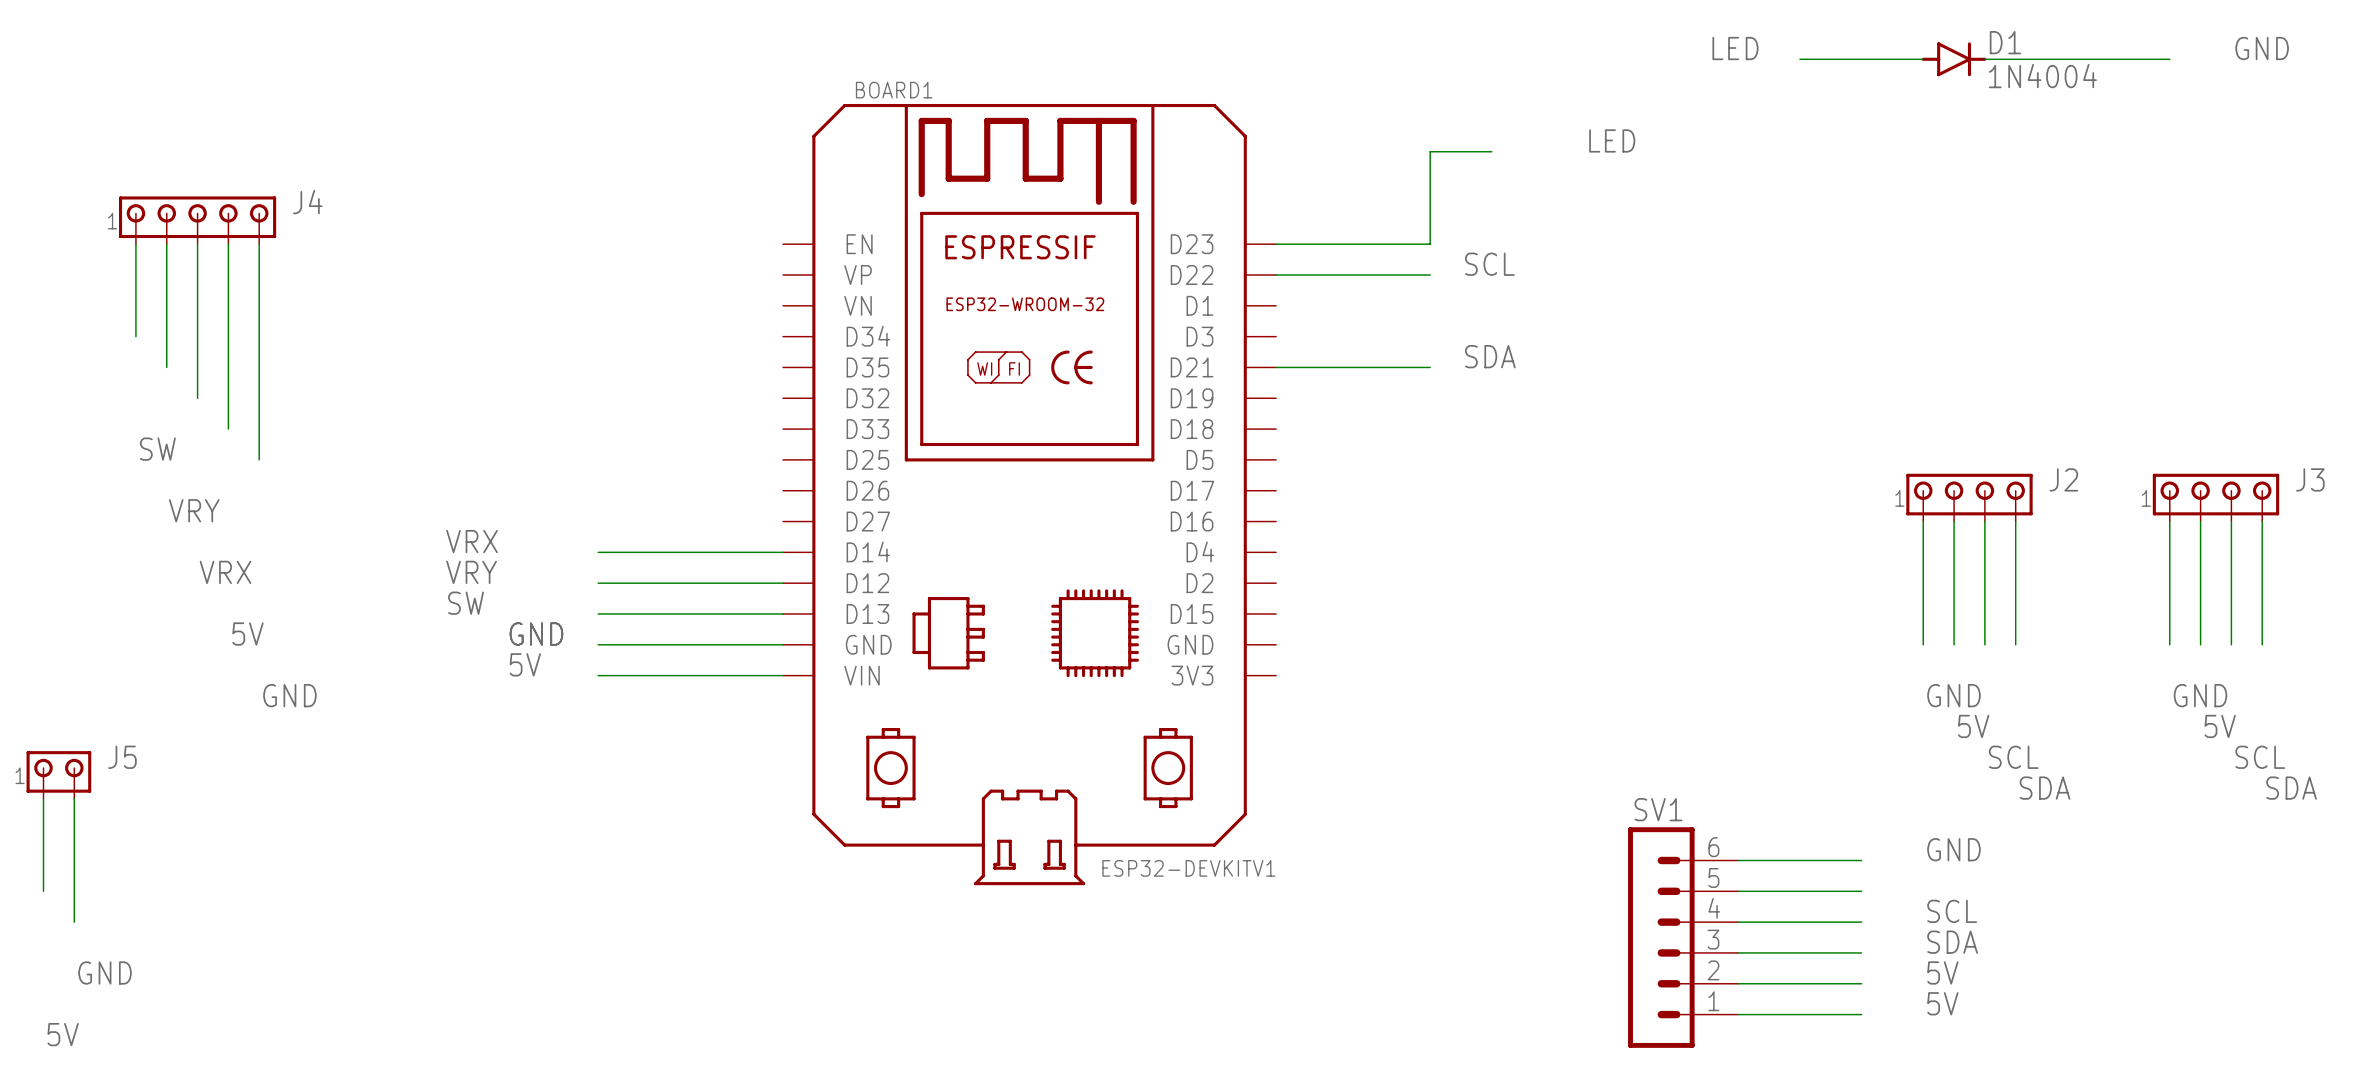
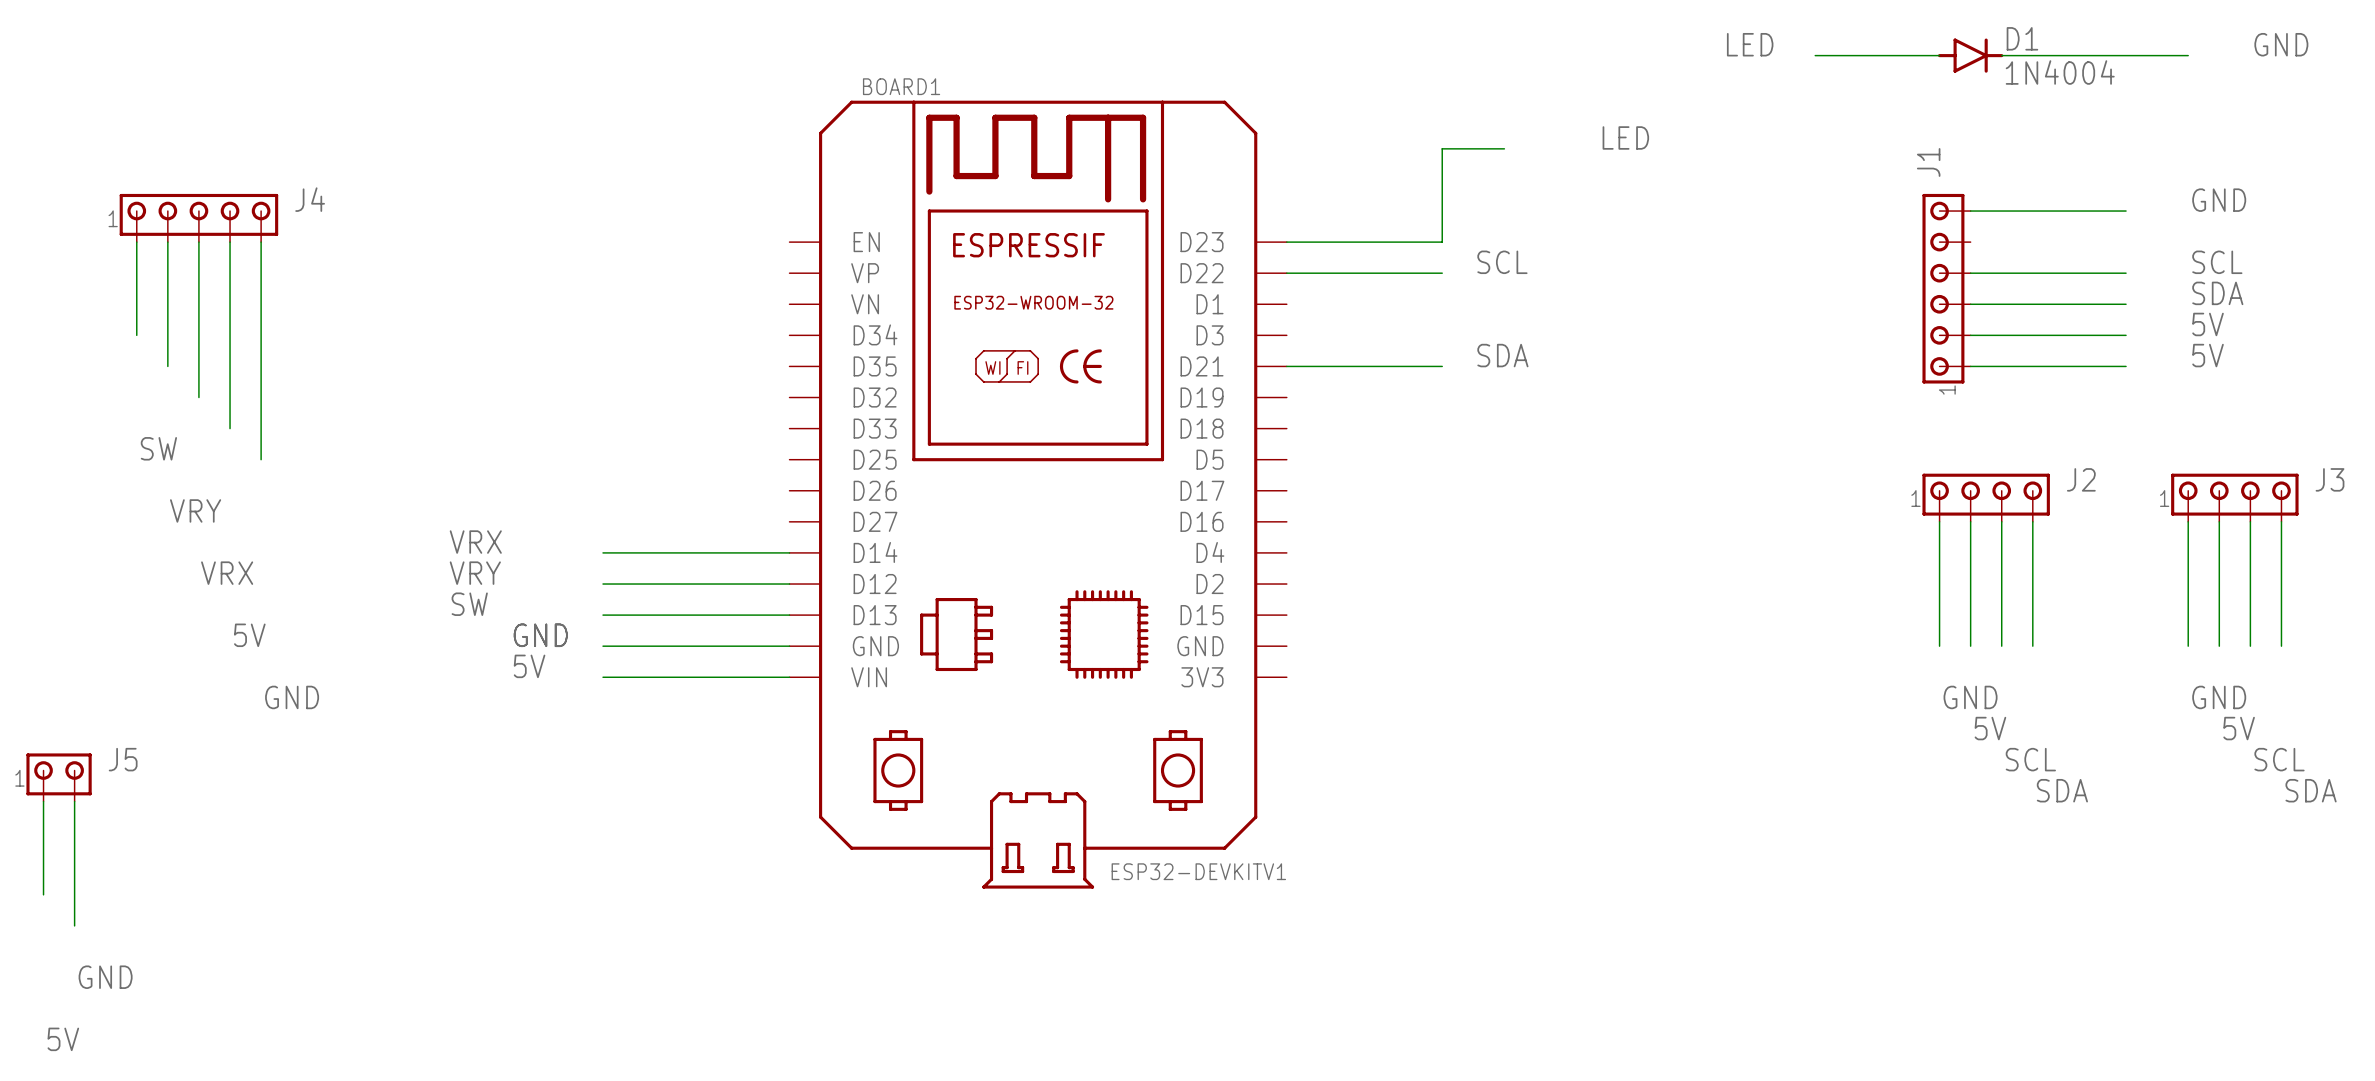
label: none -> GND (2219, 200)
wire: none -> (1970, 211) (2126, 211)
label: none -> SCL (2217, 262)
wire: none -> (1970, 273) (2126, 273)
J1: none -> (1946, 288)
label: none -> SDA (2217, 293)
wire: none -> (1970, 304) (2126, 304)
label: none -> 5V (2208, 324)
wire: none -> (1970, 335) (2126, 335)
label: none -> 5V (2208, 355)
wire: none -> (1970, 366) (2126, 366)
label: GND (1953, 849) -> none
wire: (1738, 860) (1861, 860) -> none
wire: (1738, 891) (1861, 891) -> none
label: SCL (1952, 911) -> none
wire: (1738, 922) (1861, 922) -> none
SV1: (1683, 937) -> none
label: SDA (1952, 942) -> none
wire: (1738, 952) (1861, 952) -> none
label: 5V (1942, 972) -> none
wire: (1738, 983) (1861, 983) -> none
label: 5V (1942, 1003) -> none
wire: (1738, 1014) (1861, 1014) -> none

